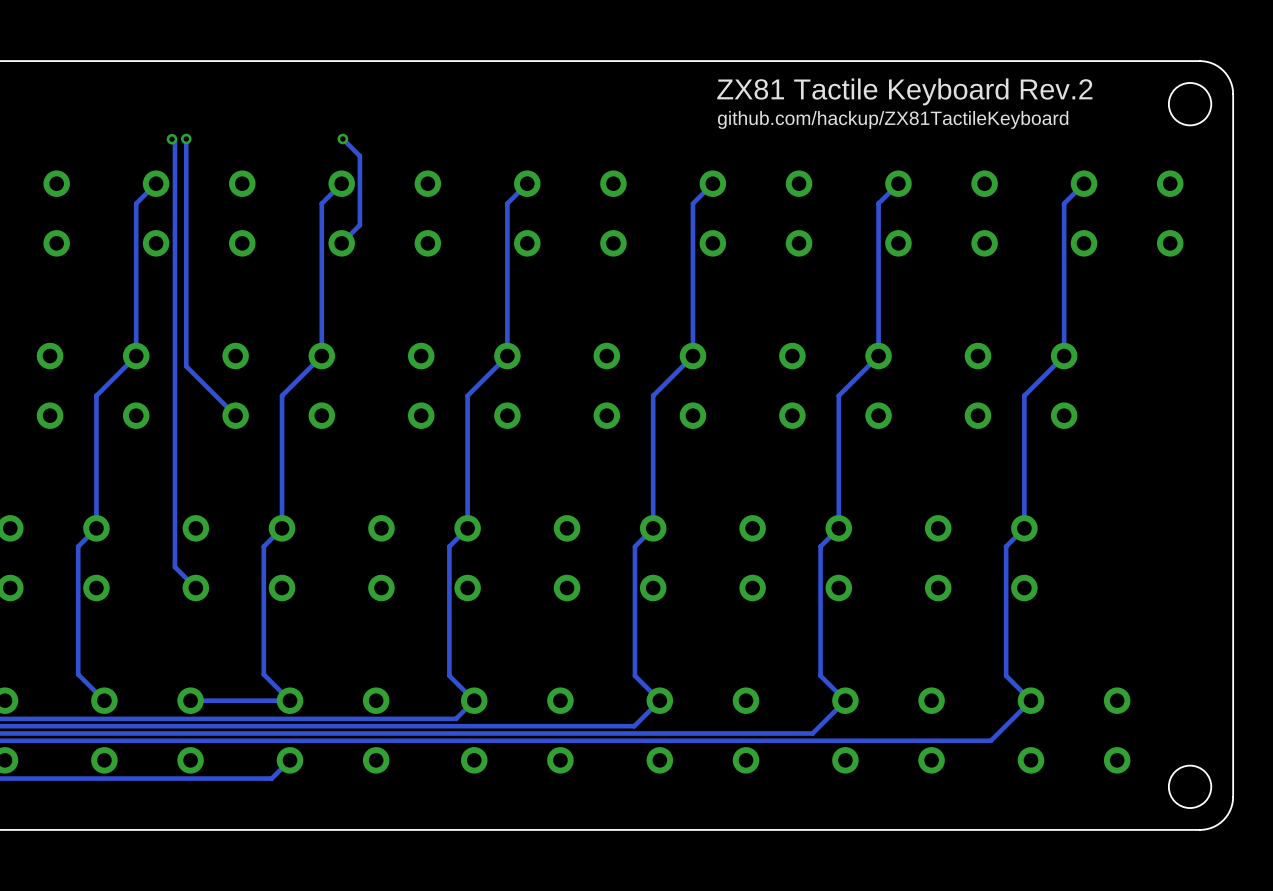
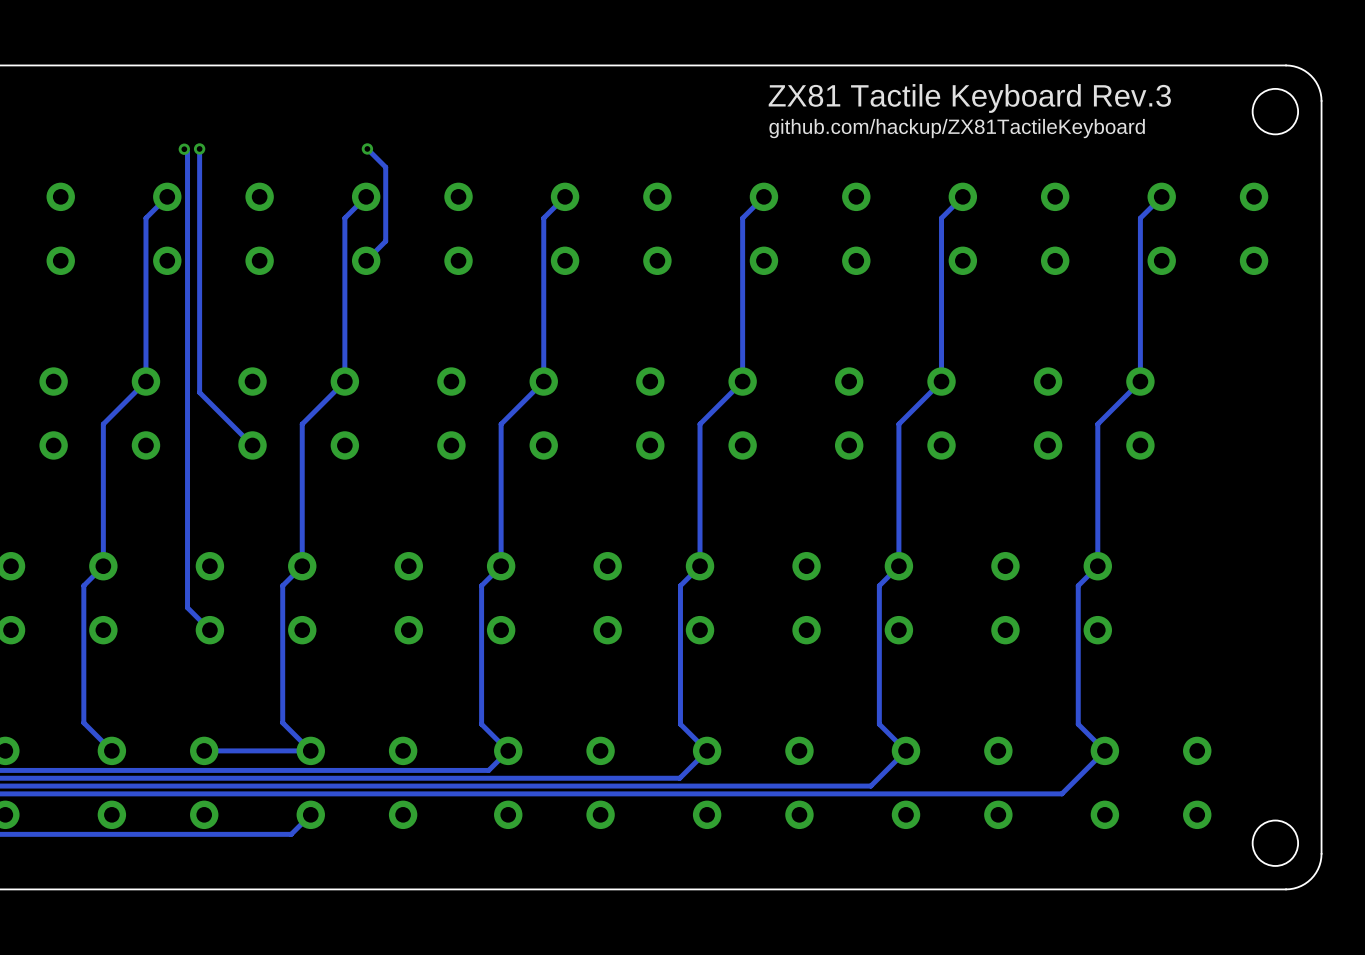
text: ZX81 Tactile Keyboard Rev.2 (904, 91) -> ZX81 Tactile Keyboard Rev.3 (969, 98)

